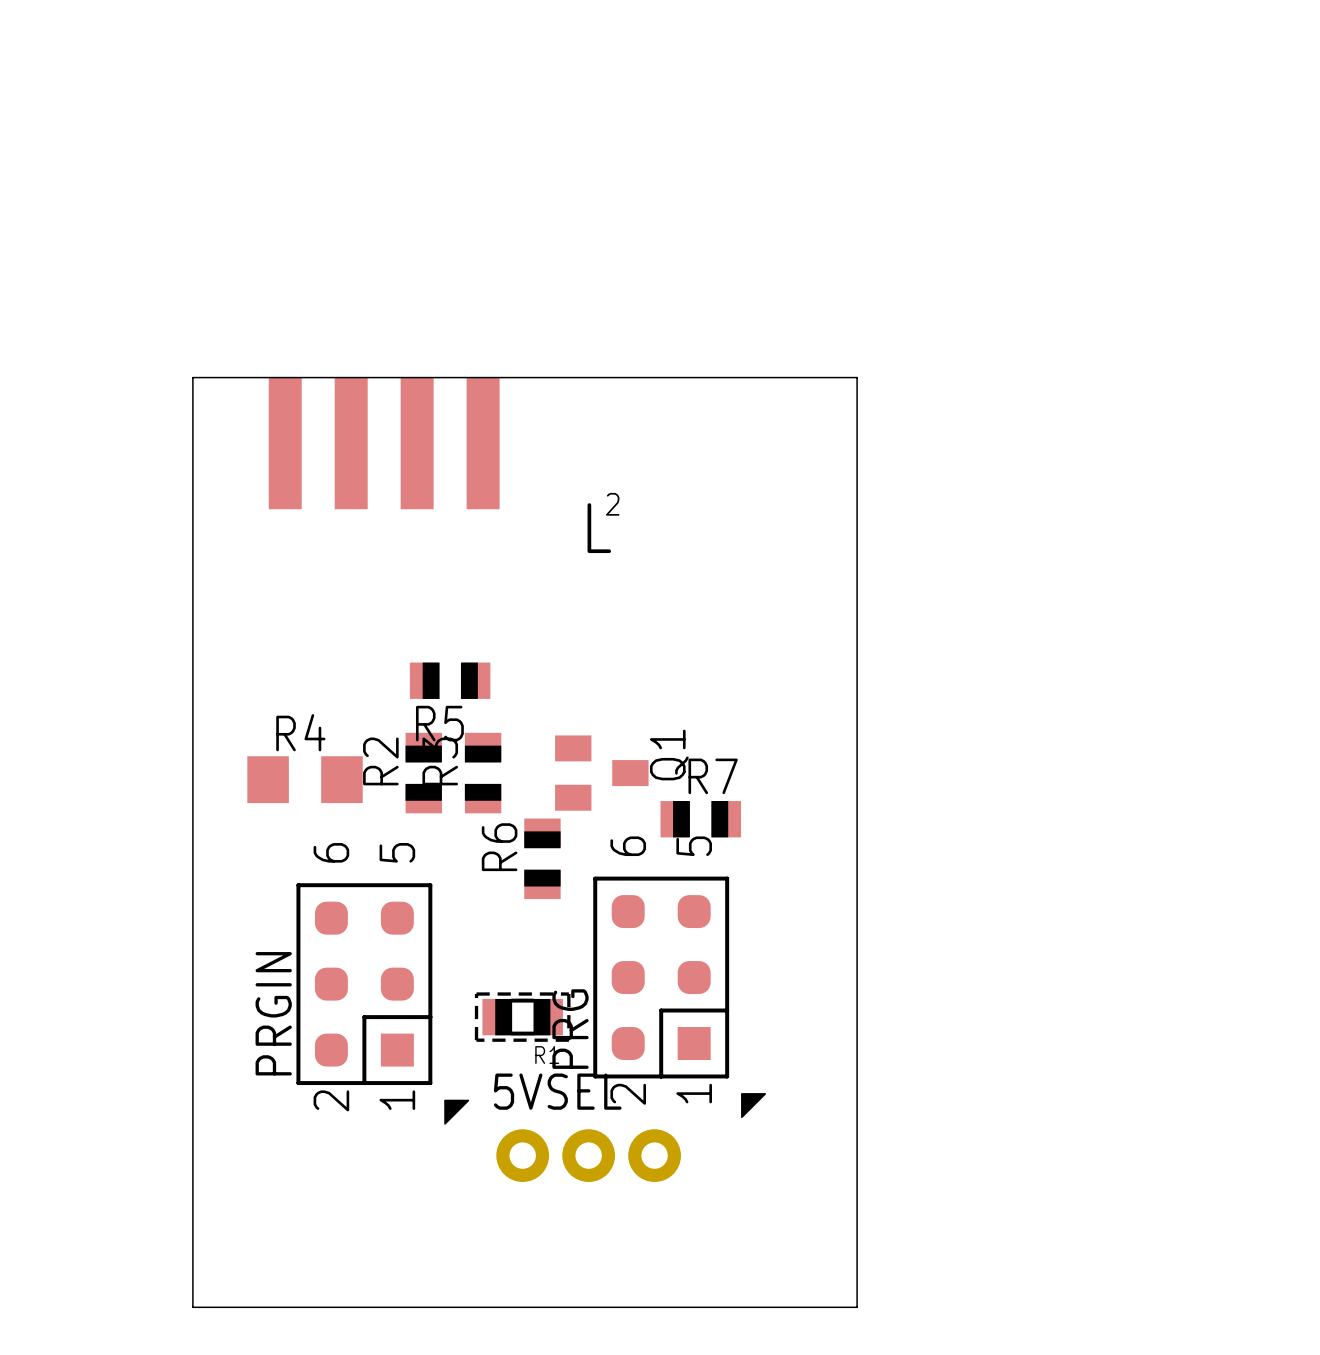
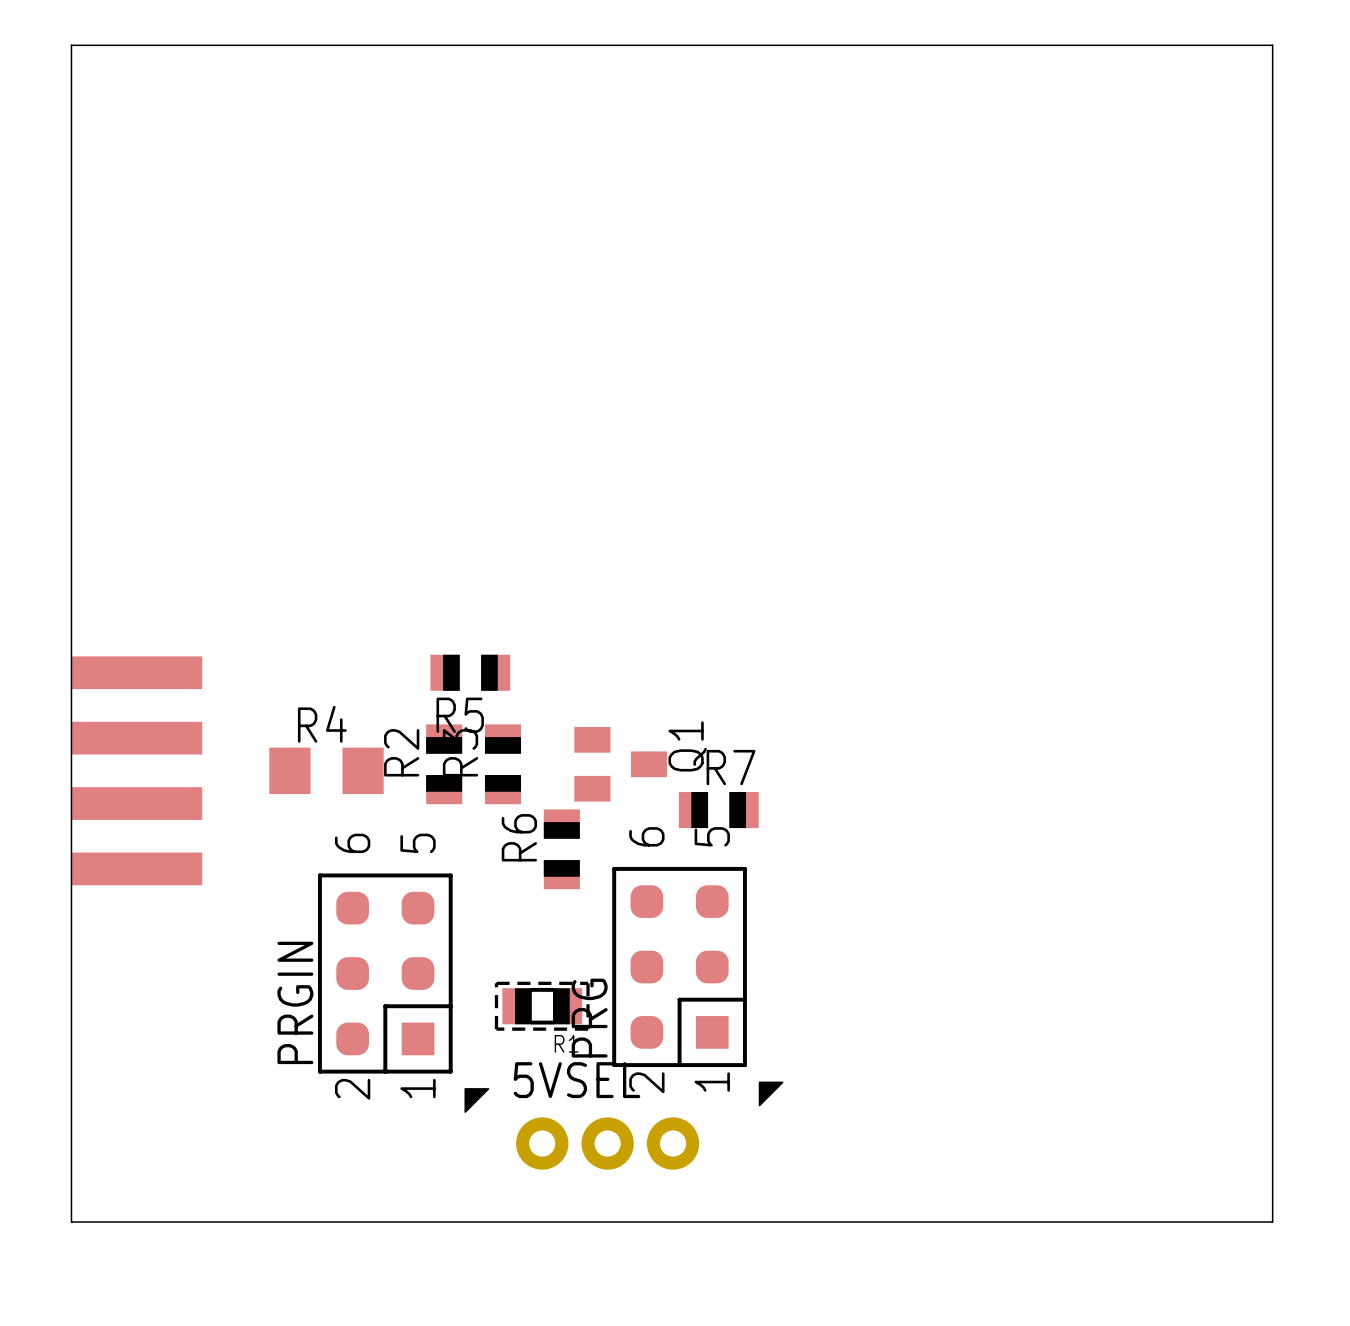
board edge: none -> (71, 45) (1272, 45) (1272, 1222) (71, 1222) (71, 45)
board edge: (192, 377) (857, 377) (857, 1307) (192, 1307) (192, 377) -> none
part rotation: 0° (384, 443) -> 90° clockwise (136, 770)
part position: (384, 443) -> (136, 770)
drawing: [587, 492, 620, 554] -> none

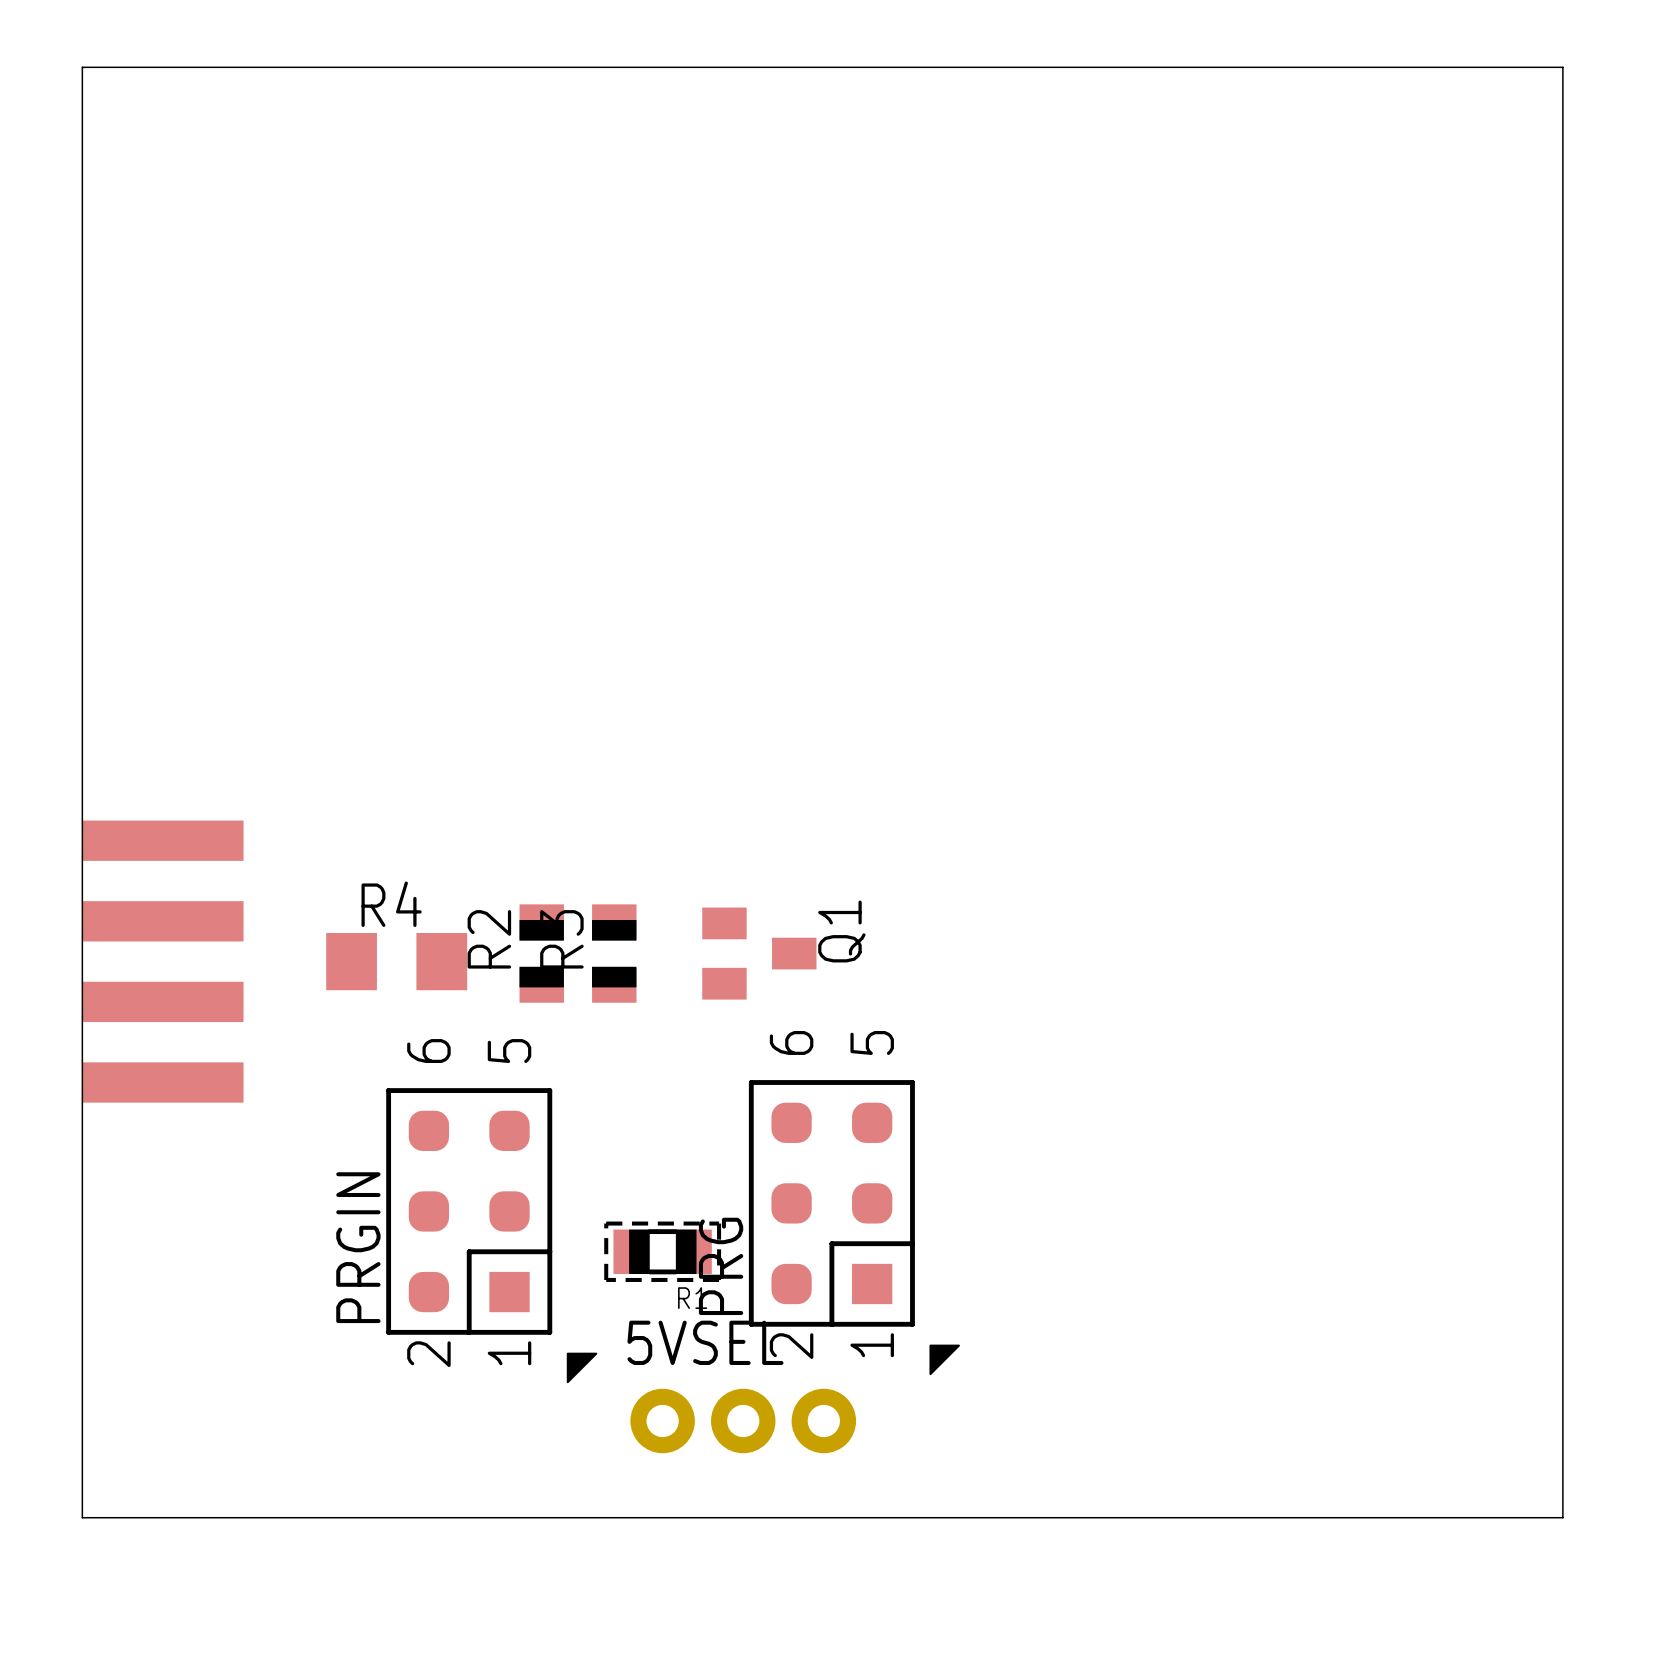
R5: (470, 672) -> none
R7: (718, 810) -> none
R6: (561, 849) -> none

